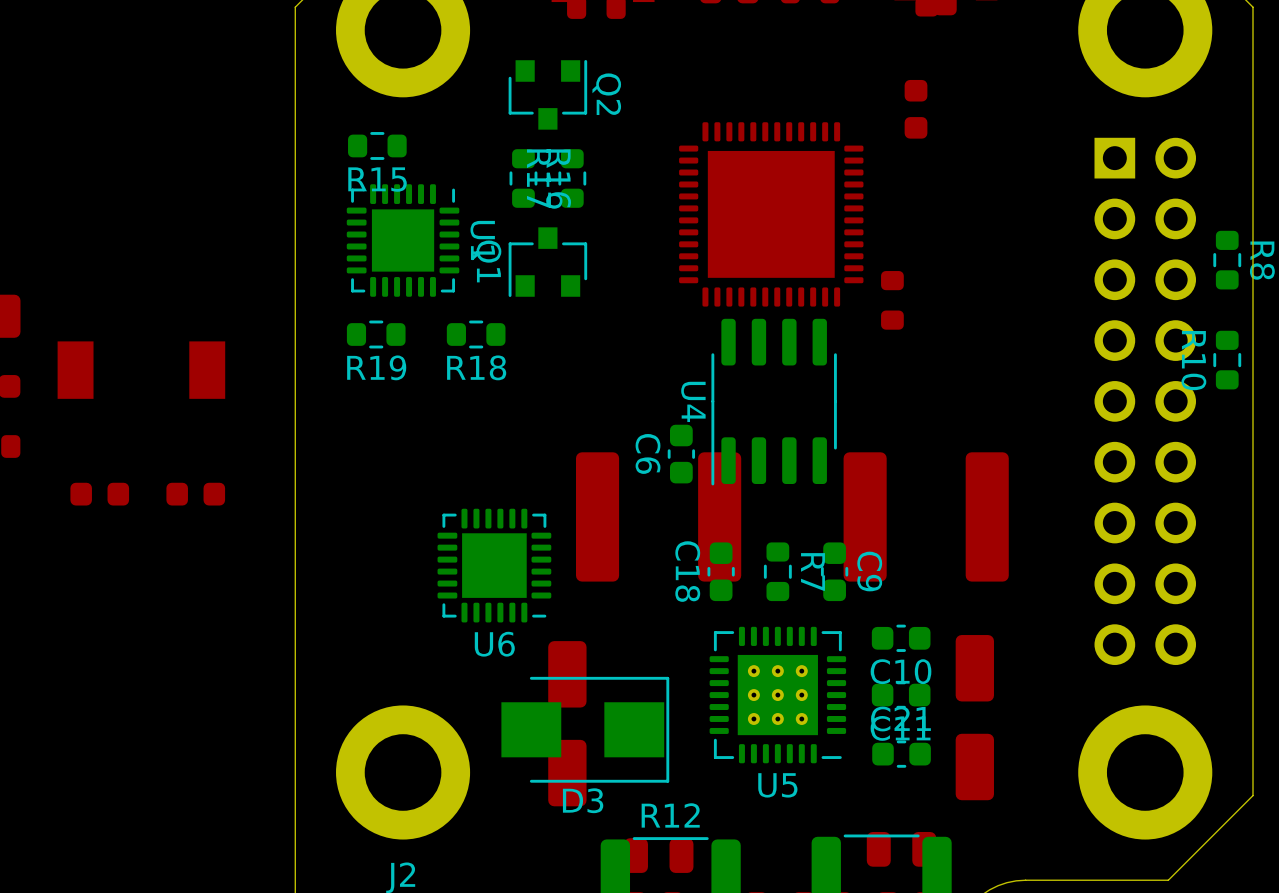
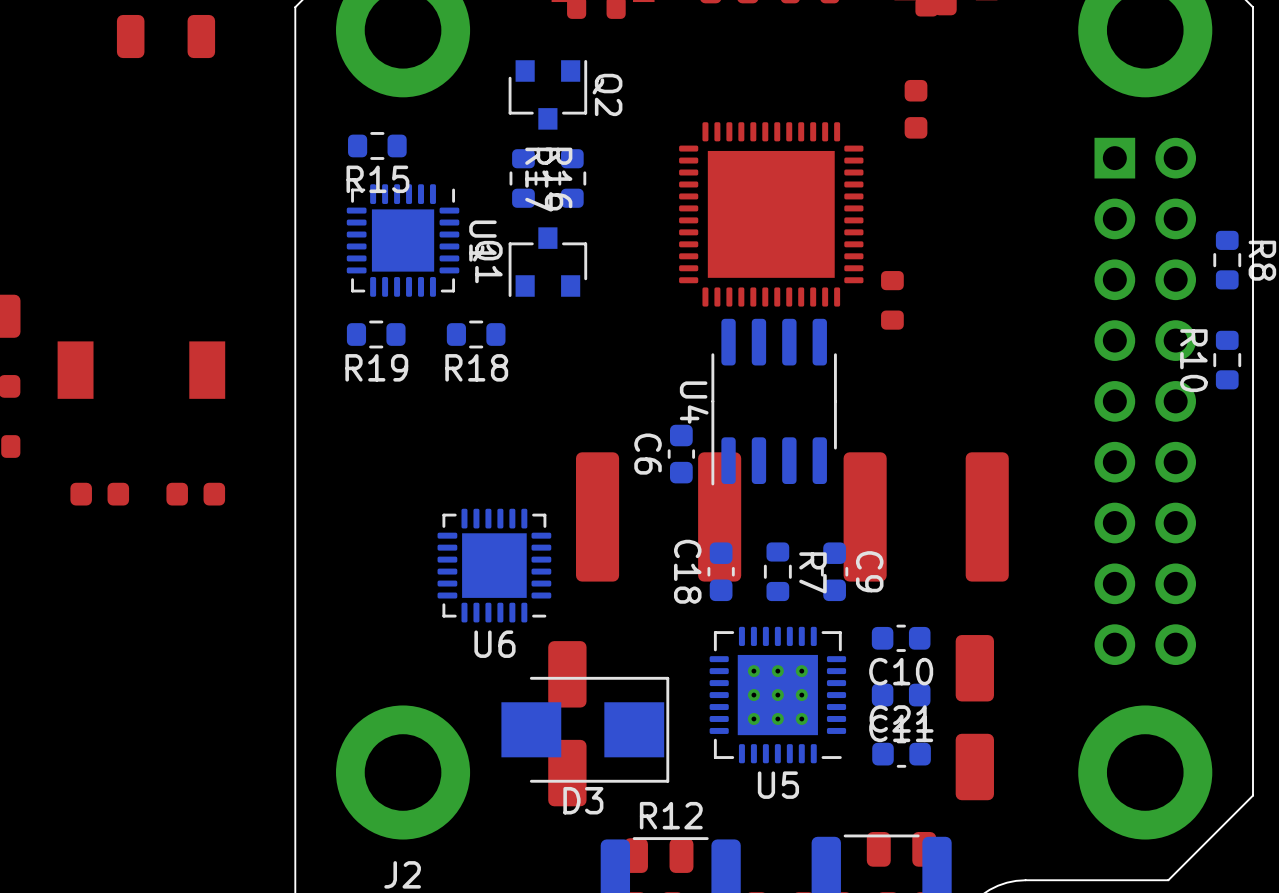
part: none -> (166, 36)

